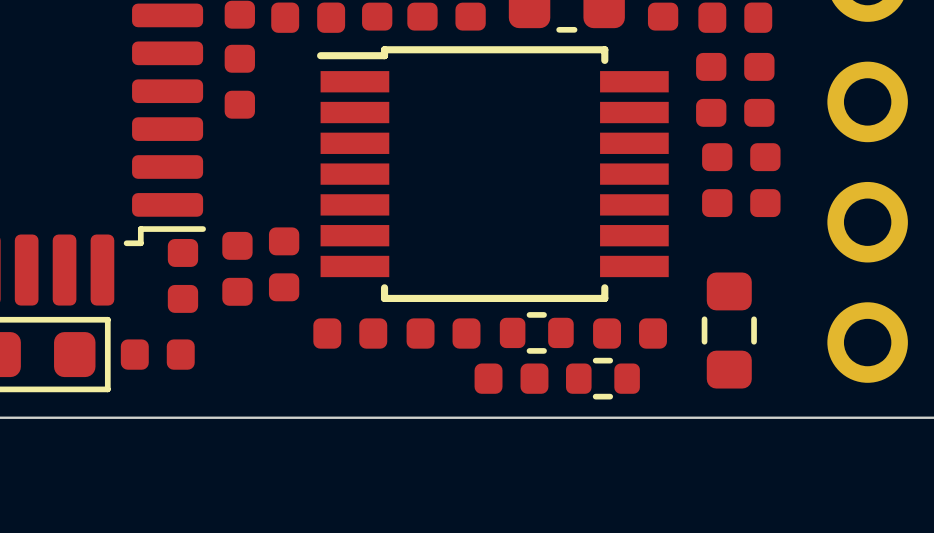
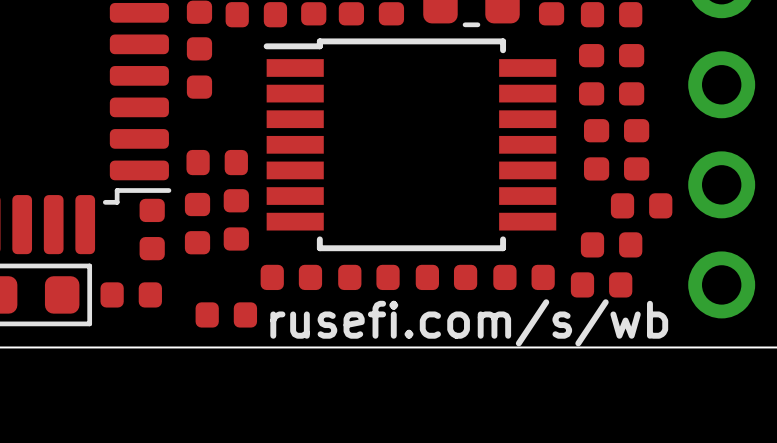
part: none -> (217, 162)
part: none -> (641, 205)
part footprint: [701, 272, 757, 389] -> [570, 272, 633, 298]
part: none -> (611, 244)
part footprint: [499, 312, 574, 354] -> [415, 264, 478, 291]
part: none -> (226, 314)
part: (511, 378) -> none
part: (602, 378) -> none
text: none -> rusefi.com/s/wb (469, 322)

